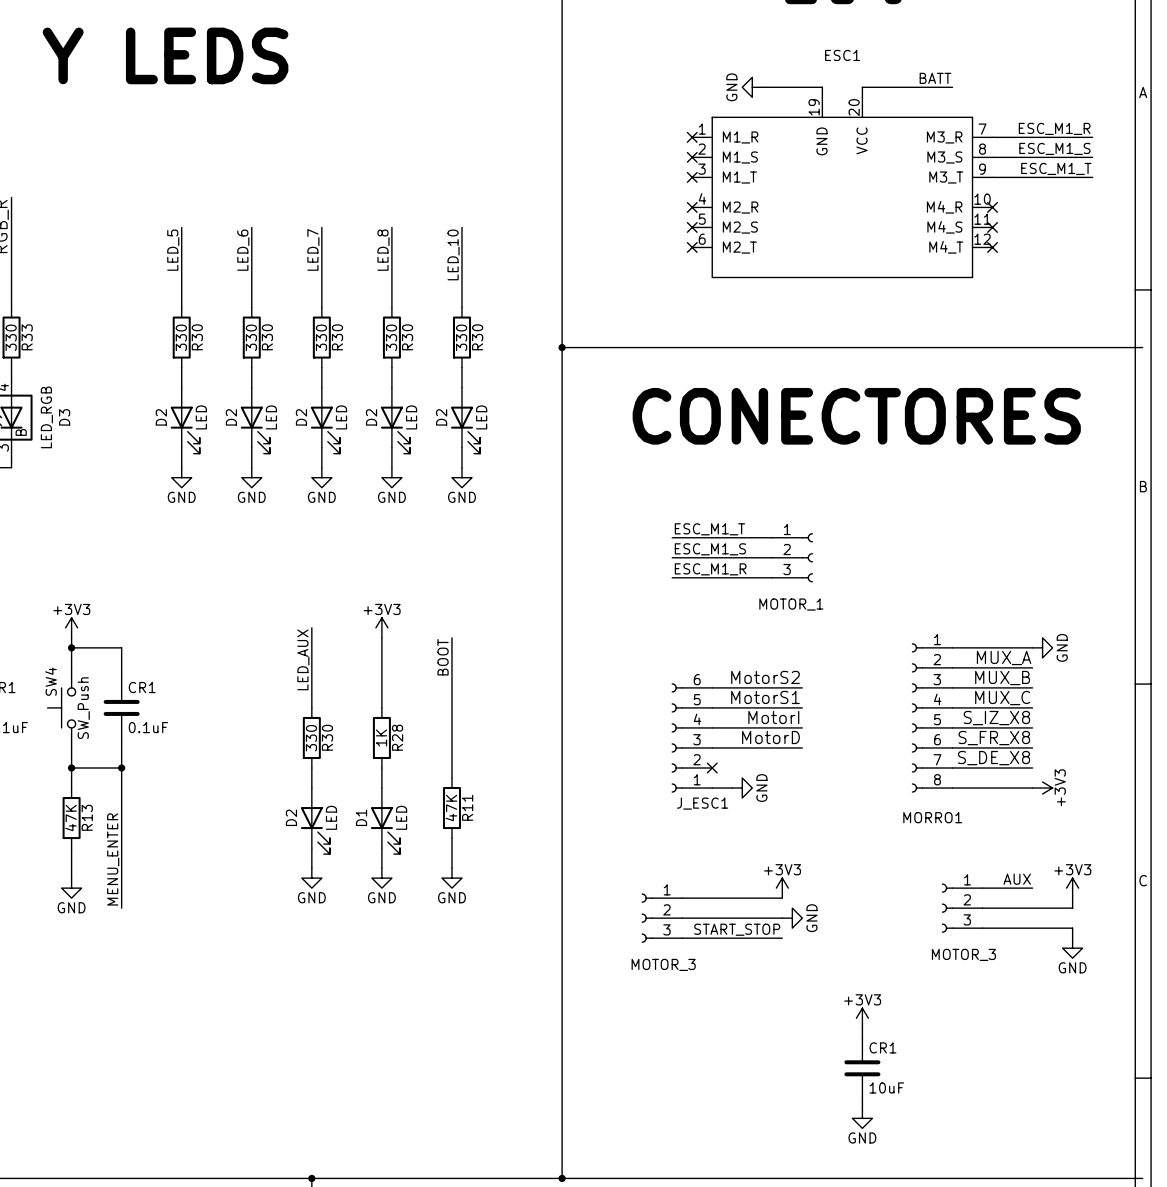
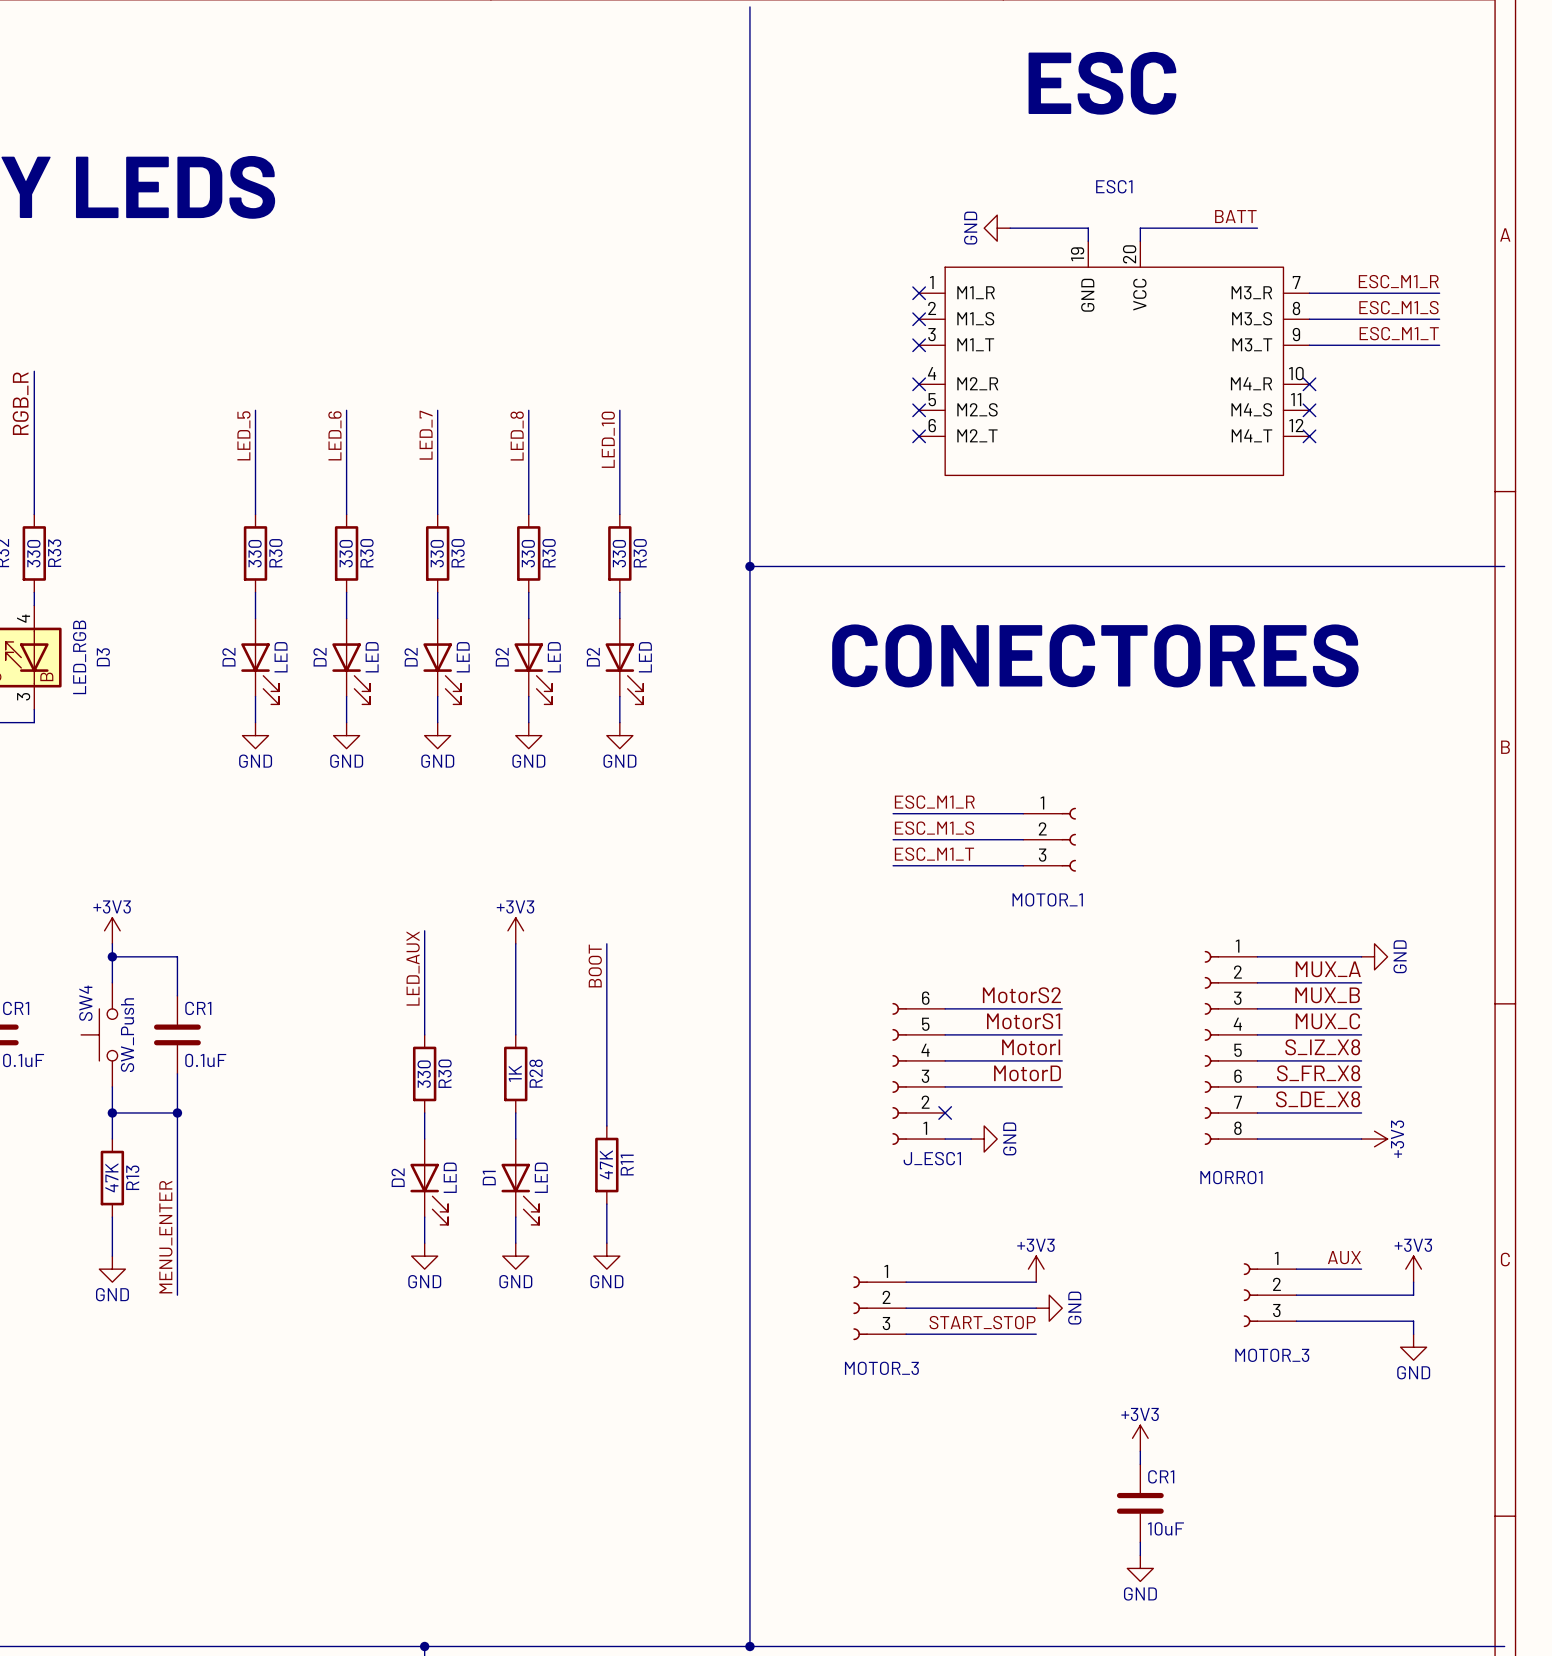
label: ESC_M1_T (709, 529) -> ESC_M1_R (934, 802)
label: ESC_M1_R (710, 569) -> ESC_M1_T (934, 854)

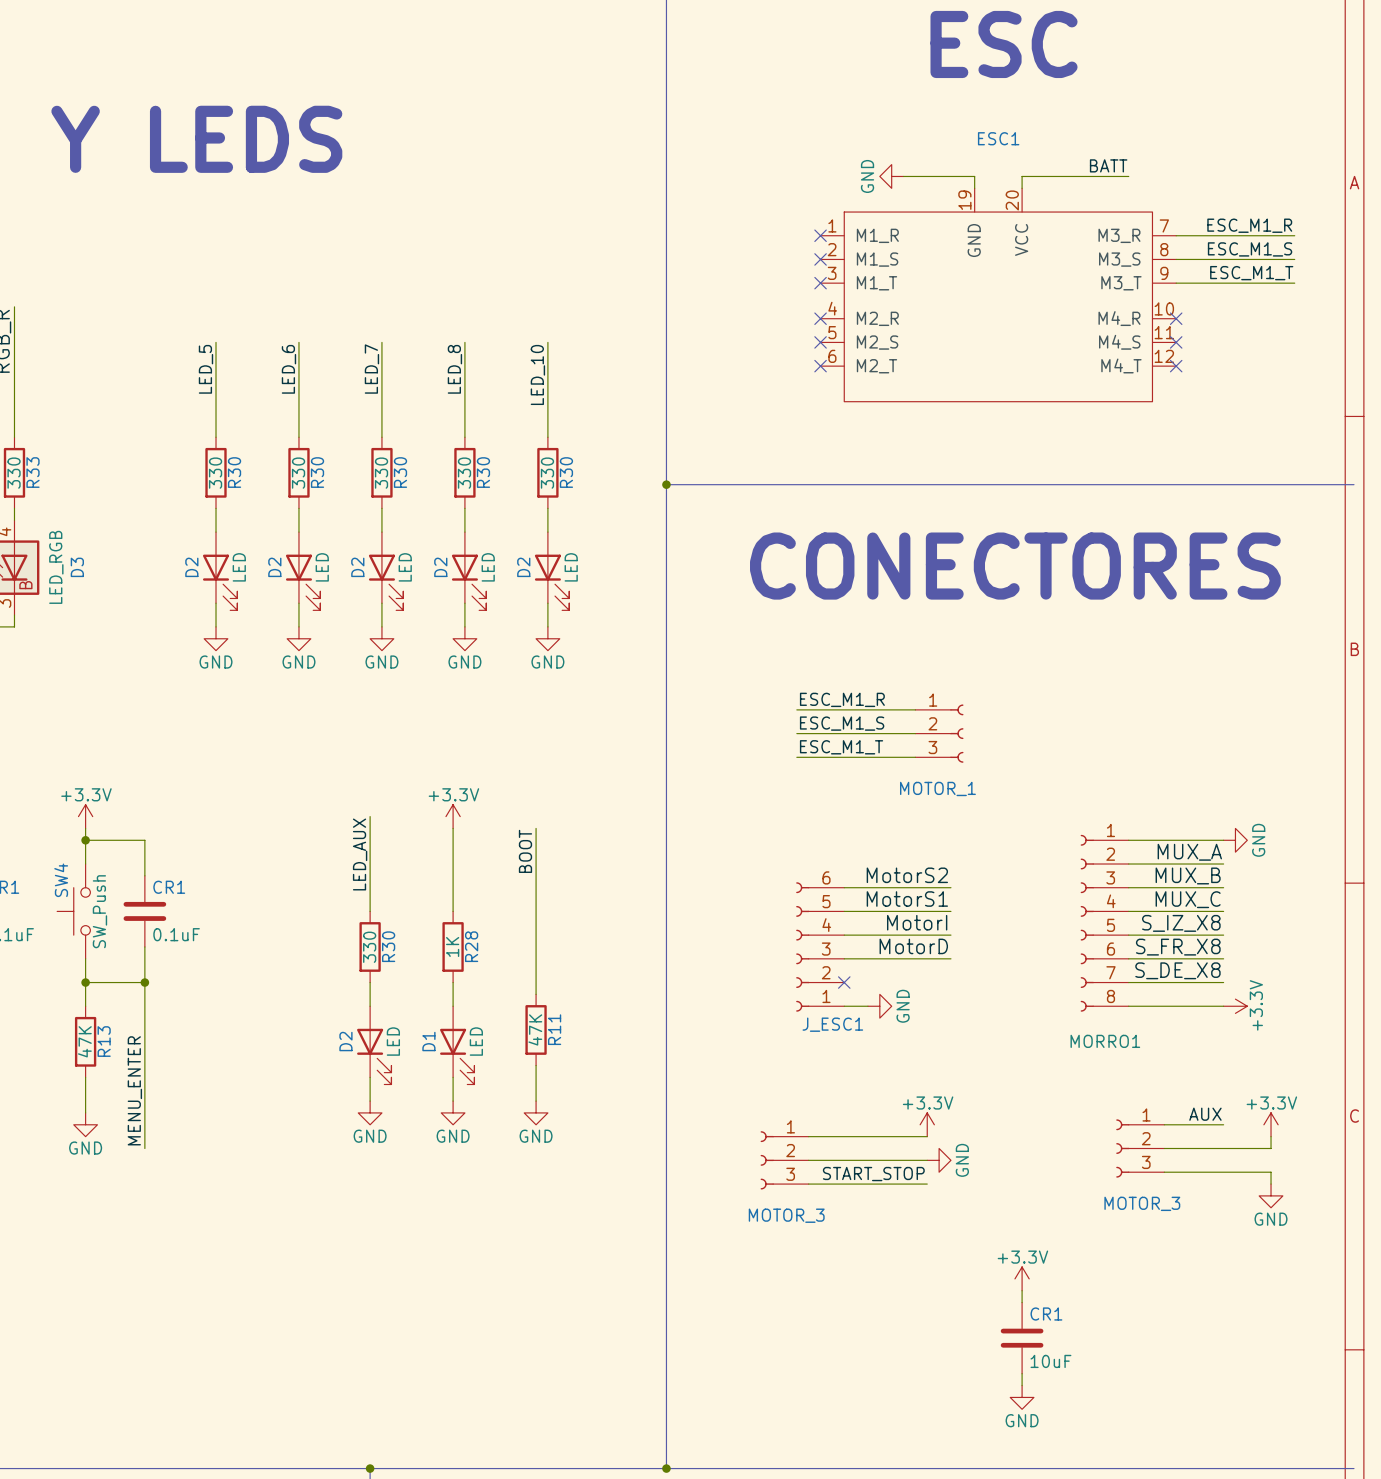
power symbol: +3V3 (112, 930) -> +3.3V (85, 816)
power symbol: +3V3 (515, 930) -> +3.3V (453, 816)
power symbol: +3V3 (1374, 1139) -> +3.3V (1235, 1006)
power symbol: +3V3 (1036, 1269) -> +3.3V (927, 1124)
power symbol: +3V3 (1413, 1269) -> +3.3V (1271, 1124)
power symbol: +3V3 (1140, 1438) -> +3.3V (1022, 1278)

